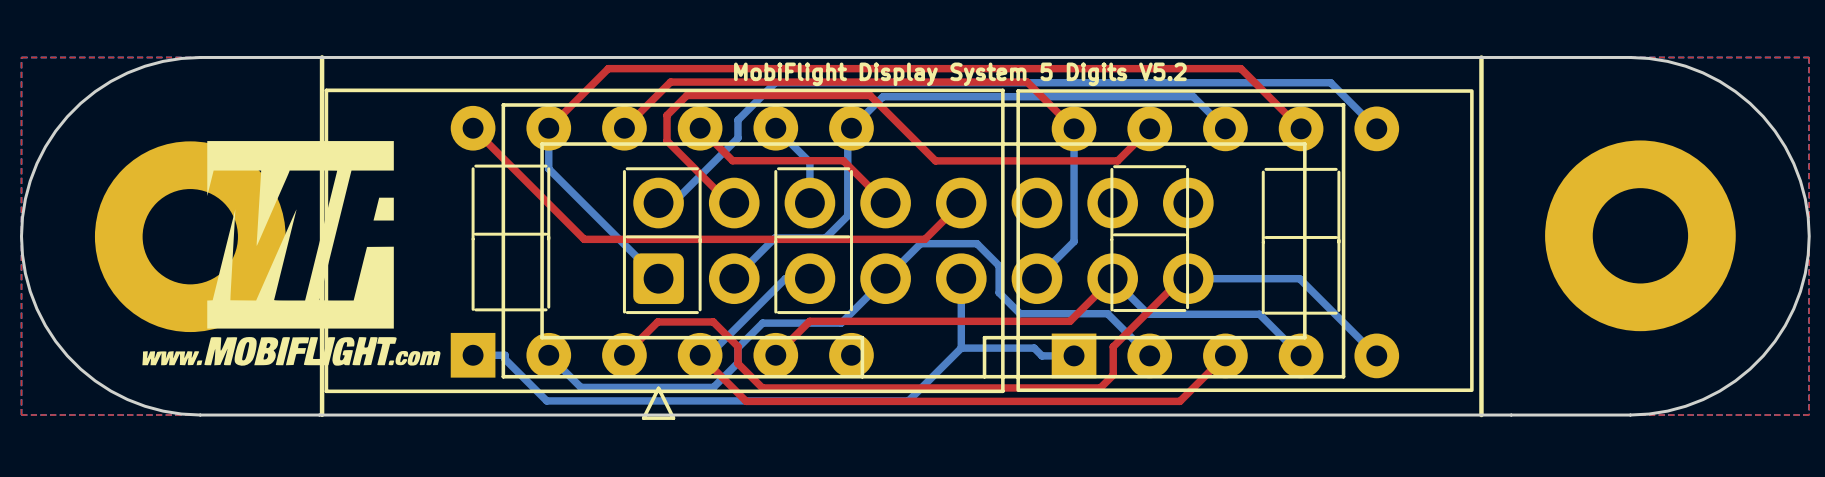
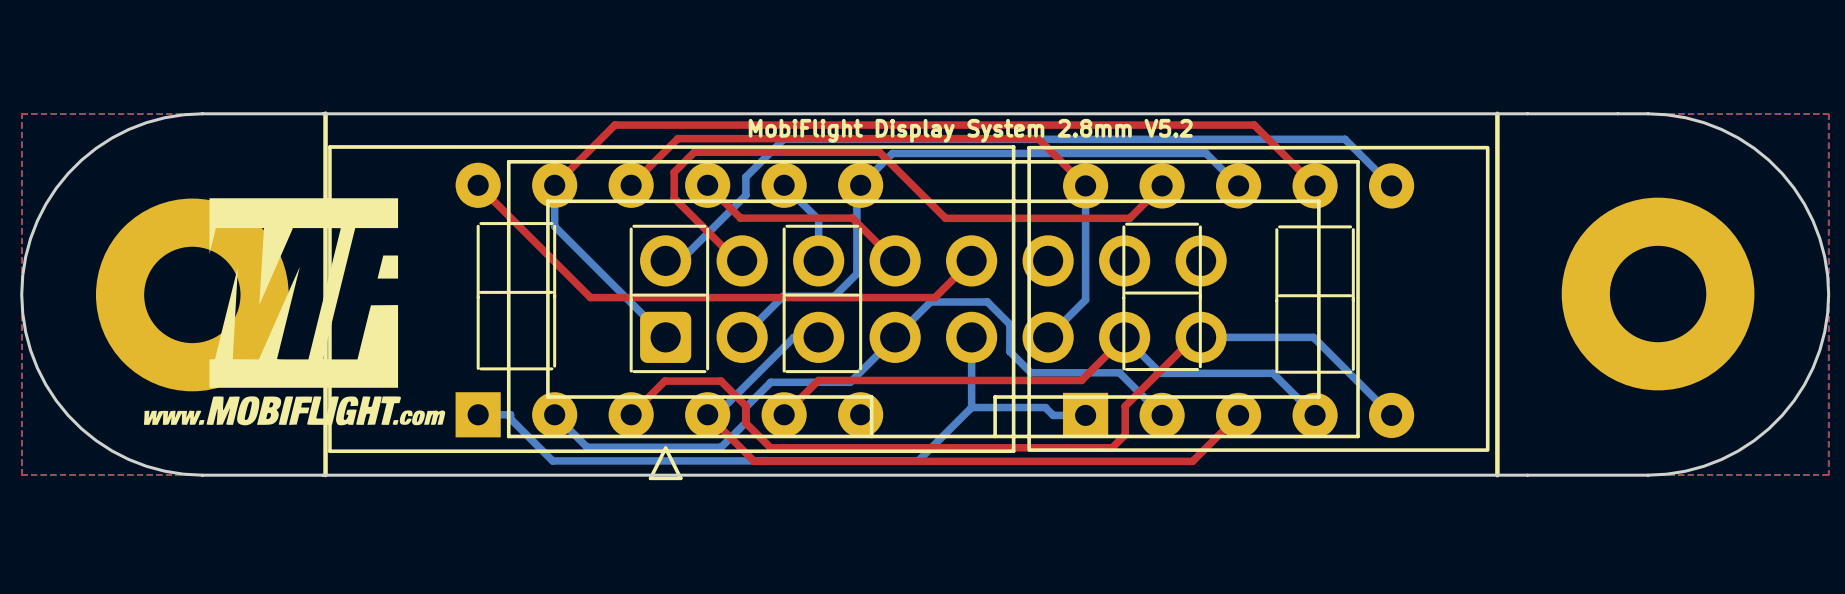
text: MobiFlight Display System 5 Digits V5.2 (960, 74) -> MobiFlight Display System 2.8mm V5.2 (970, 130)

